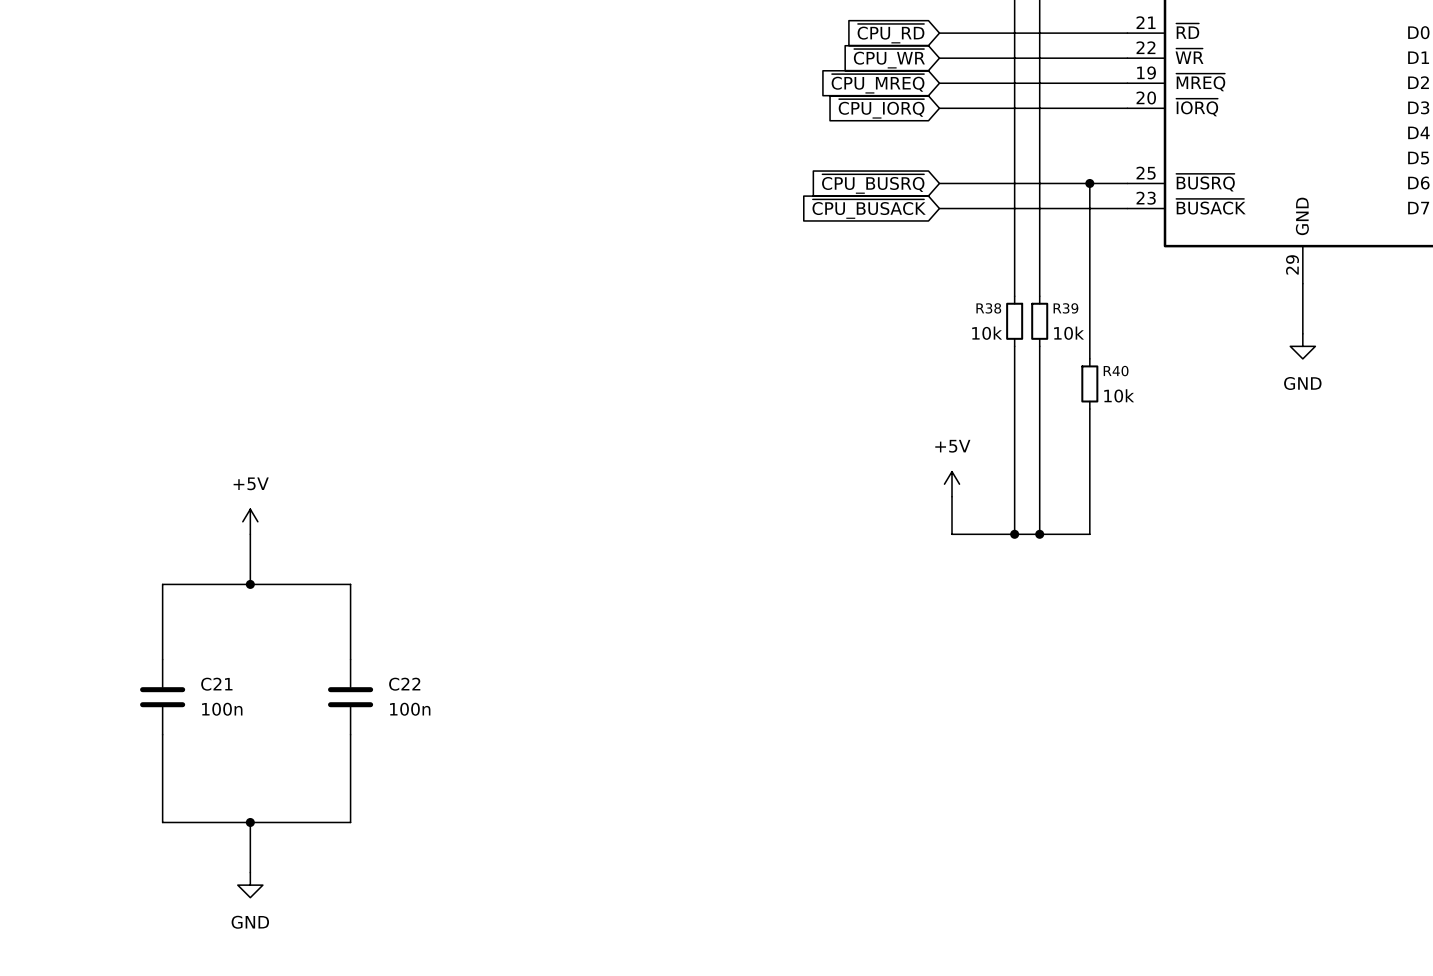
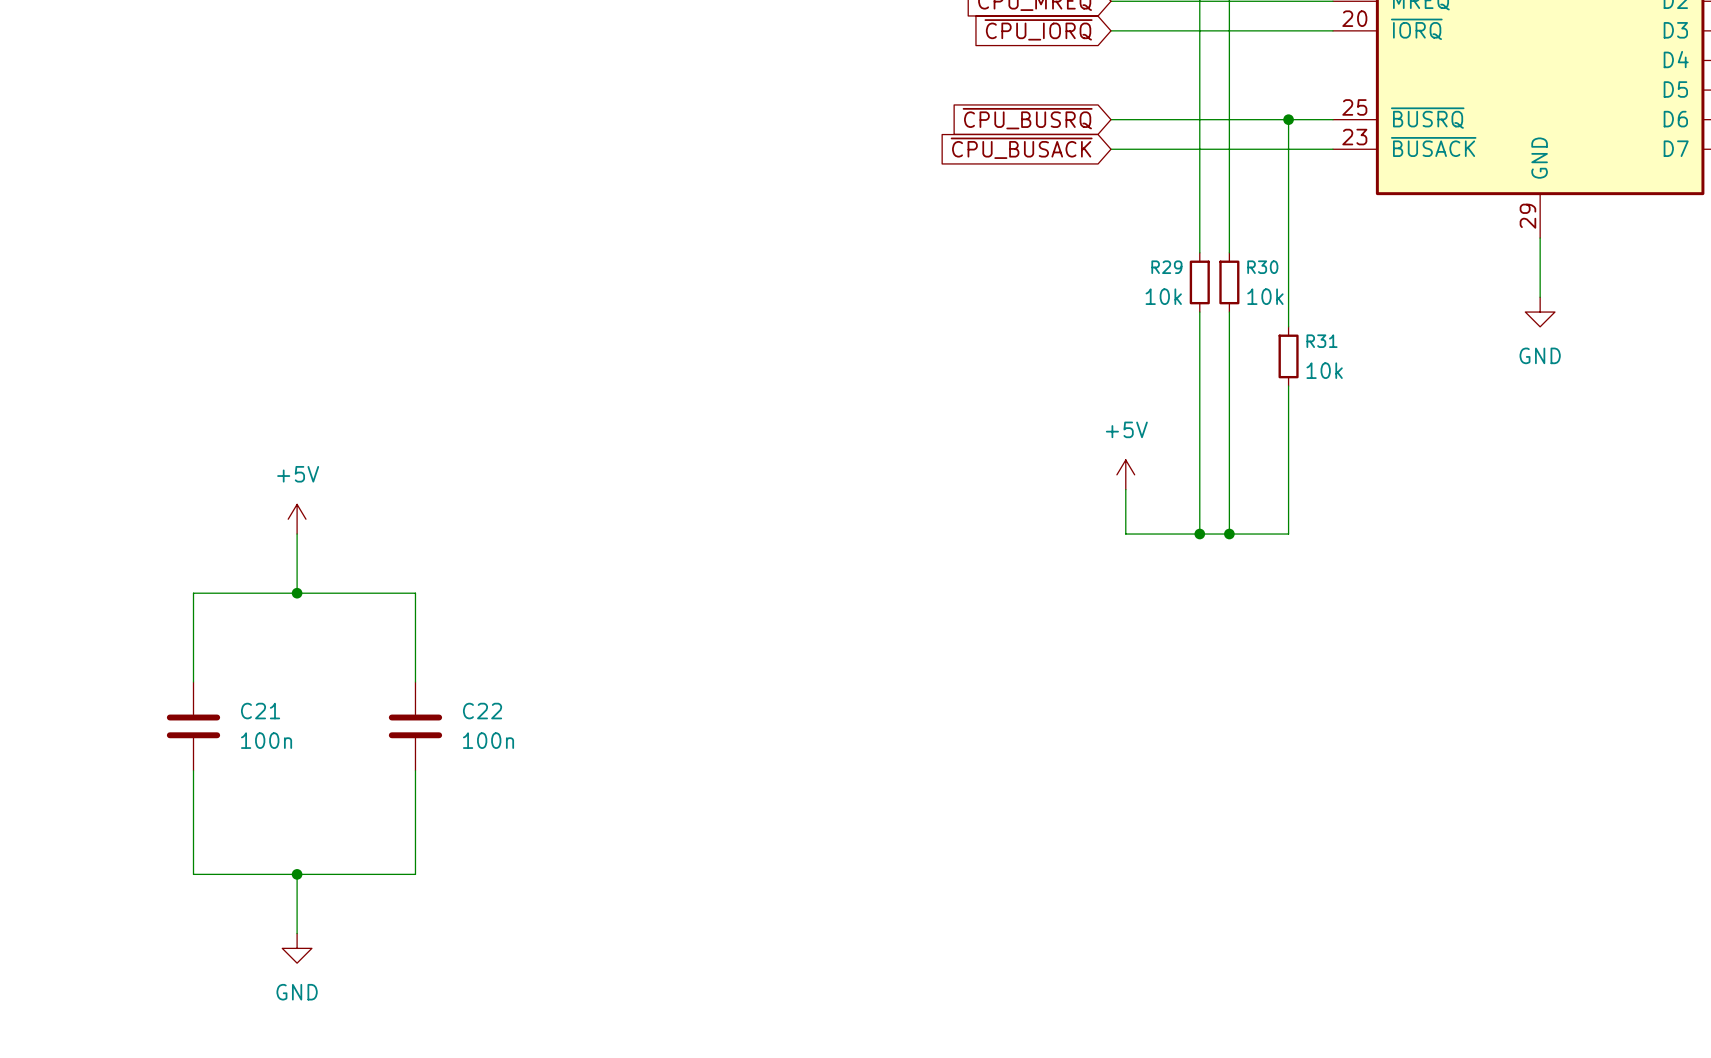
R38 name: R38 (988, 308) -> R29 (1166, 267)
R39 name: R39 (1065, 308) -> R30 (1262, 267)
R40 name: R40 (1116, 371) -> R31 (1322, 341)

